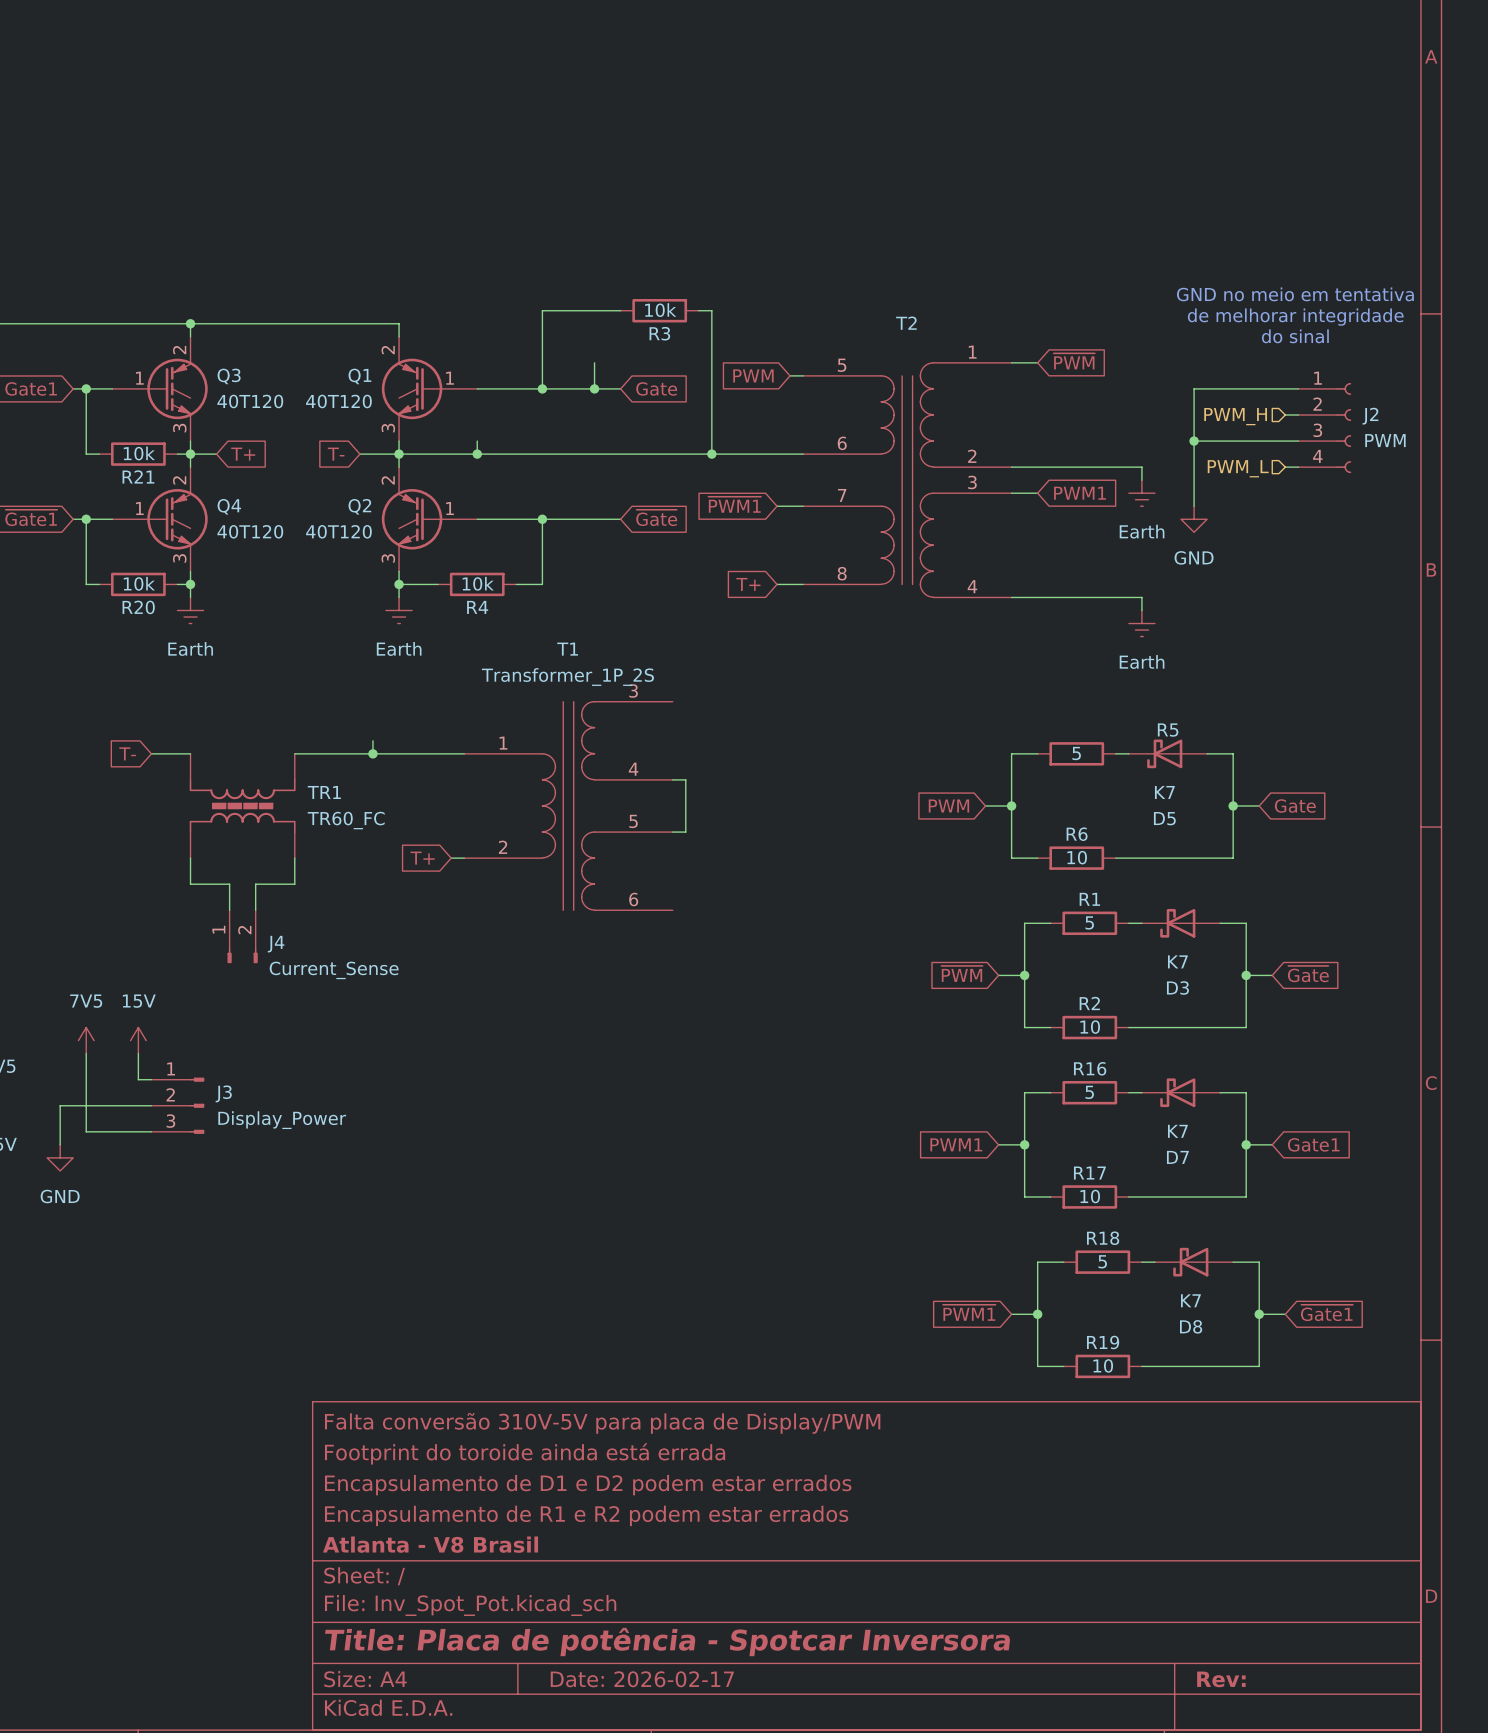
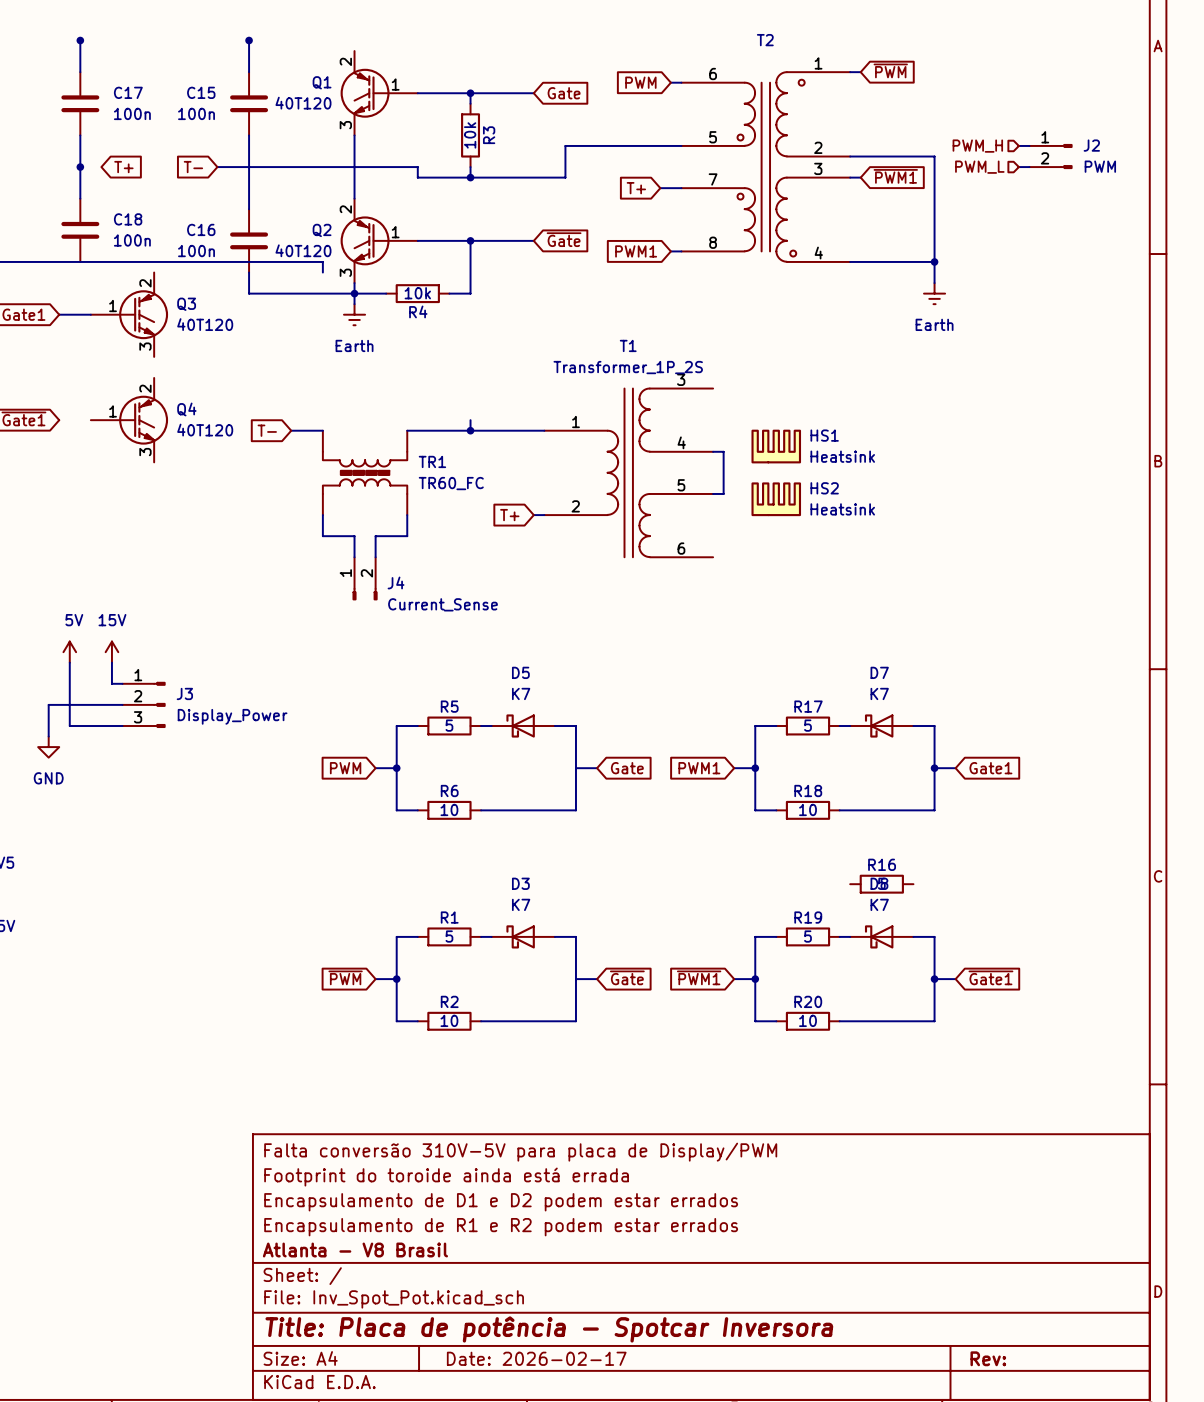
wire: none -> (80, 40) (80, 72)
junction: none -> (80, 40)
wire: none -> (249, 40) (249, 72)
junction: none -> (249, 40)
global label: none -> ~{PWM} (890, 70)
wire: none -> (850, 72) (860, 72)
global label: none -> PWM (640, 82)
wire: none -> (670, 82) (681, 82)
wire: none -> (417, 93) (533, 93)
wire: none -> (470, 93) (470, 103)
junction: none -> (470, 93)
global label: none -> Gate (564, 93)
C17: none -> 100n (80, 103)
C15: none -> 100n (249, 103)
wire: none -> (80, 135) (80, 198)
wire: none -> (249, 135) (249, 209)
wire: none -> (354, 135) (354, 198)
wire: none -> (681, 145) (565, 145) (565, 177) (417, 177) (417, 167) (217, 167)
wire: none -> (1018, 145) (1029, 145)
wire: none -> (850, 156) (934, 156) (934, 283)
junction: none -> (80, 167)
global label: none -> T+ (123, 167)
global label: none -> T- (193, 167)
wire: none -> (470, 167) (470, 177)
hierarchical label: none -> PWM_L (979, 167)
global label: none -> ~{PWM1} (895, 176)
junction: none -> (470, 177)
wire: none -> (850, 177) (860, 177)
global label: none -> T+ (636, 188)
C18: none -> 100n (80, 230)
text: GND no meio em tentativa (1295, 294) -> none
C16: none -> 100n (249, 240)
junction: none -> (470, 240)
wire: (620, 310) (542, 310) (542, 388) -> none
R3 rotation: 0° (659, 310) -> 90° clockwise (470, 135)
R3 position: (659, 310) -> (470, 135)
wire: (698, 310) (711, 310) (711, 454) -> none
global label: none -> PWM1 (636, 251)
text: de melhorar integridade (1295, 317) -> none
wire: (190, 323) (190, 336) -> none
junction: (190, 323) -> none
junction: none -> (934, 261)
R3 name position: R3 (659, 333) -> R3 (489, 135)
wire: none -> (249, 272) (249, 293) (386, 293)
text: do sinal (1295, 336) -> none
global label: ~{PWM} (1074, 361) -> none
junction: none -> (354, 293)
wire: (594, 362) (594, 388) -> none
T2 symbol: [803, 362, 1012, 598] -> [681, 72, 851, 262]
wire: (1011, 362) (1037, 362) -> (660, 188) (681, 188)
power symbol: none -> Earth (934, 293)
global label: PWM (753, 375) -> none
wire: (790, 375) (803, 375) -> (670, 251) (681, 251)
J2 symbol: [1298, 382, 1352, 474] -> [1029, 144, 1073, 169]
wire: (86, 388) (86, 454) (99, 454) -> none
junction: (86, 388) -> none
Q1 position: (429, 388) -> (379, 93)
power symbol: none -> Earth (354, 314)
wire: (477, 388) (620, 388) -> none
junction: (542, 388) -> none
junction: (594, 388) -> none
global label: Gate (656, 388) -> none
wire: (1298, 388) (1194, 388) (1194, 506) -> none
wire: (1285, 415) (1298, 415) -> (1018, 167) (1029, 167)
hierarchical label position: PWM_H (1235, 416) -> PWM_H (977, 146)
wire: (190, 441) (190, 467) -> none
wire: (399, 441) (399, 467) -> none
wire: (477, 441) (477, 454) -> (470, 420) (470, 430)
wire: (1194, 441) (1298, 441) -> (850, 261) (934, 261)
junction: (1194, 441) -> none
R21: 10k (138, 454) -> none
wire: (177, 454) (216, 454) -> none
junction: (190, 454) -> none
global label: T+ (243, 454) -> none
global label position: T- (336, 454) -> T- (267, 430)
wire: (359, 454) (803, 454) -> none
junction: (399, 454) -> none
junction: (477, 454) -> none
junction: (711, 454) -> none
wire: (1011, 467) (1141, 467) (1141, 480) -> none
wire: (1285, 467) (1298, 467) -> none
hierarchical label: PWM_L (1238, 468) -> none
wire: (1011, 493) (1037, 493) -> none
global label: PWM1 (1080, 493) -> none
power symbol: Earth (1141, 493) -> none
global label: ~{PWM1} (734, 504) -> none
wire: (777, 506) (803, 506) -> none
global label position: ~{Gate} (656, 517) -> ~{Gate} (564, 239)
wire: (73, 519) (112, 519) -> none
wire: (86, 519) (86, 584) (99, 584) -> none
junction: (86, 519) -> none
Q2 position: (429, 519) -> (379, 240)
wire: (477, 519) (620, 519) -> (417, 240) (533, 240)
wire: (542, 519) (542, 584) (516, 584) -> (470, 240) (470, 293) (449, 293)
junction position: (542, 519) -> (470, 430)
power symbol: GND (1194, 519) -> none
wire: none -> (407, 430) (544, 430)
HS1: none -> Heatsink (776, 446)
wire: none -> (713, 451) (723, 451) (723, 493) (713, 493)
wire: (190, 571) (190, 597) -> none
wire: (399, 571) (399, 597) -> (354, 283) (354, 304)
R20 value: 10k (139, 583) -> 10 (808, 1020)
R20 position: (138, 584) -> (808, 1021)
wire: (177, 584) (190, 584) -> none
junction: (190, 584) -> none
wire: (399, 584) (438, 584) -> (291, 430) (322, 430)
junction: (399, 584) -> none
R4 position: (477, 584) -> (417, 293)
global label position: T+ (748, 584) -> T+ (509, 515)
wire: (777, 584) (803, 584) -> none
wire: (1011, 597) (1141, 597) (1141, 610) -> none
R20 name position: R20 (138, 607) -> R20 (808, 1001)
power symbol: Earth (190, 610) -> none
power symbol: Earth (399, 610) -> none
HS2: none -> Heatsink (776, 499)
power symbol: Earth (1141, 623) -> none
wire: none -> (322, 515) (322, 536) (354, 536) (354, 557)
wire: none -> (407, 515) (407, 536) (375, 536) (375, 557)
wire: none -> (533, 515) (544, 515)
R5 name position: R5 (1168, 730) -> R5 (449, 706)
wire: (372, 740) (372, 753) -> none
global label: T- (127, 753) -> none
wire: (151, 753) (190, 753) -> none
wire: (294, 753) (464, 753) -> none
junction: (372, 753) -> none
wire: (1037, 753) (1011, 753) (1011, 858) (1037, 858) -> none
R5 position: (1076, 753) -> (449, 726)
wire: (1115, 753) (1128, 753) -> none
D5 flip: as is (1164, 753) -> up-down (520, 726)
D5 position: (1168, 753) -> (523, 726)
wire: (1207, 753) (1233, 753) (1233, 858) (1115, 858) -> none
wire: (672, 779) (685, 779) (685, 832) (672, 832) -> none
power symbol: none -> 5V (69, 652)
TR1 position: (242, 806) -> (365, 472)
T1 position: (568, 806) -> (628, 472)
global label: PWM (948, 806) -> none
wire: (985, 806) (1011, 806) -> none
junction: (1011, 806) -> none
wire: (1233, 806) (1259, 806) -> none
junction: (1233, 806) -> none
global label: Gate (1295, 806) -> none
wire: (190, 858) (190, 884) (229, 884) (229, 910) -> none
wire: (294, 858) (294, 884) (255, 884) (255, 910) -> none
global label: T+ (422, 858) -> none
wire: (451, 858) (464, 858) -> (481, 726) (491, 726)
R6 position: (1076, 858) -> (449, 810)
wire: none -> (417, 726) (396, 726) (396, 810) (417, 810)
wire: none -> (554, 726) (575, 726) (575, 810) (481, 810)
power symbol: none -> GND (48, 747)
wire: (1050, 923) (1024, 923) (1024, 1027) (1050, 1027) -> (776, 726) (755, 726) (755, 810) (776, 810)
R1 position: (1089, 923) -> (449, 936)
wire: (1128, 923) (1141, 923) -> (839, 726) (850, 726)
D3 flip: as is (1177, 923) -> up-down (520, 936)
D3 position: (1181, 923) -> (523, 936)
wire: (1220, 923) (1246, 923) (1246, 1027) (1128, 1027) -> (913, 726) (934, 726) (934, 810) (839, 810)
J4 position: (242, 936) -> (365, 578)
global label: none -> PWM (345, 768)
wire: none -> (375, 768) (396, 768)
junction: none -> (396, 768)
wire: none -> (575, 768) (597, 768)
global label: none -> Gate (627, 768)
junction: none -> (755, 768)
junction: none -> (934, 768)
global label: ~{PWM} (961, 973) -> none
global label: ~{Gate} (1308, 974) -> none
wire: (998, 975) (1024, 975) -> (734, 768) (755, 768)
junction: (1024, 975) -> none
wire: (1246, 975) (1272, 975) -> (934, 768) (955, 768)
junction: (1246, 975) -> none
R2 position: (1089, 1027) -> (449, 1021)
power symbol: 7V5 (86, 1040) -> none
power symbol position: 15V (138, 1040) -> 15V (111, 652)
wire: (86, 1053) (86, 1131) (151, 1131) -> (69, 662) (69, 726) (122, 726)
wire: (138, 1053) (138, 1079) (151, 1079) -> (111, 662) (111, 683) (122, 683)
wire: (1050, 1092) (1024, 1092) (1024, 1196) (1050, 1196) -> (776, 936) (755, 936) (755, 1021) (776, 1021)
wire: (1128, 1092) (1141, 1092) -> (839, 936) (850, 936)
D7 flip: as is (1177, 1092) -> up-down (879, 726)
D7 position: (1181, 1092) -> (881, 726)
wire: (1220, 1092) (1246, 1092) (1246, 1196) (1128, 1196) -> none
wire: (151, 1105) (60, 1105) (60, 1144) -> (122, 704) (48, 704) (48, 736)
J3 position: (177, 1105) -> (143, 704)
global label position: PWM1 (956, 1144) -> PWM1 (699, 768)
wire: (998, 1144) (1024, 1144) -> (734, 979) (755, 979)
junction: (1024, 1144) -> none
wire: (1246, 1144) (1272, 1144) -> (934, 979) (955, 979)
junction: (1246, 1144) -> none
global label position: Gate1 (1313, 1144) -> Gate1 (990, 768)
power symbol: GND (60, 1157) -> none
wire: none -> (417, 936) (396, 936) (396, 1021) (417, 1021)
wire: none -> (481, 936) (491, 936)
wire: none -> (554, 936) (575, 936) (575, 1021) (481, 1021)
wire: none -> (913, 936) (934, 936) (934, 1021)
R17 position: (1089, 1196) -> (808, 726)
R17 value: 10 (1090, 1196) -> 5 (808, 725)
global label: none -> ~{PWM} (345, 977)
global label: none -> ~{Gate} (627, 977)
wire: none -> (375, 979) (396, 979)
junction: none -> (396, 979)
wire: none -> (575, 979) (597, 979)
junction: none -> (755, 979)
junction: none -> (934, 979)
R18 value: 5 (1102, 1261) -> 10 (808, 809)
wire: (1037, 1262) (1037, 1366) (1063, 1366) -> none
wire: none -> (860, 1021) (924, 1021)
R18 position: (1102, 1262) -> (808, 810)
D8 flip: as is (1190, 1262) -> up-down (879, 936)
D8 position: (1194, 1262) -> (881, 936)
wire: (1233, 1262) (1259, 1262) (1259, 1366) (1141, 1366) -> none
global label position: ~{PWM1} (969, 1312) -> ~{PWM1} (699, 977)
global label position: ~{Gate1} (1326, 1312) -> ~{Gate1} (990, 977)
wire: (1011, 1314) (1037, 1314) -> none
junction: (1037, 1314) -> none
wire: (1259, 1314) (1285, 1314) -> none
junction: (1259, 1314) -> none
R19 value: 10 (1103, 1365) -> 5 (808, 936)
R19 position: (1102, 1366) -> (808, 936)

